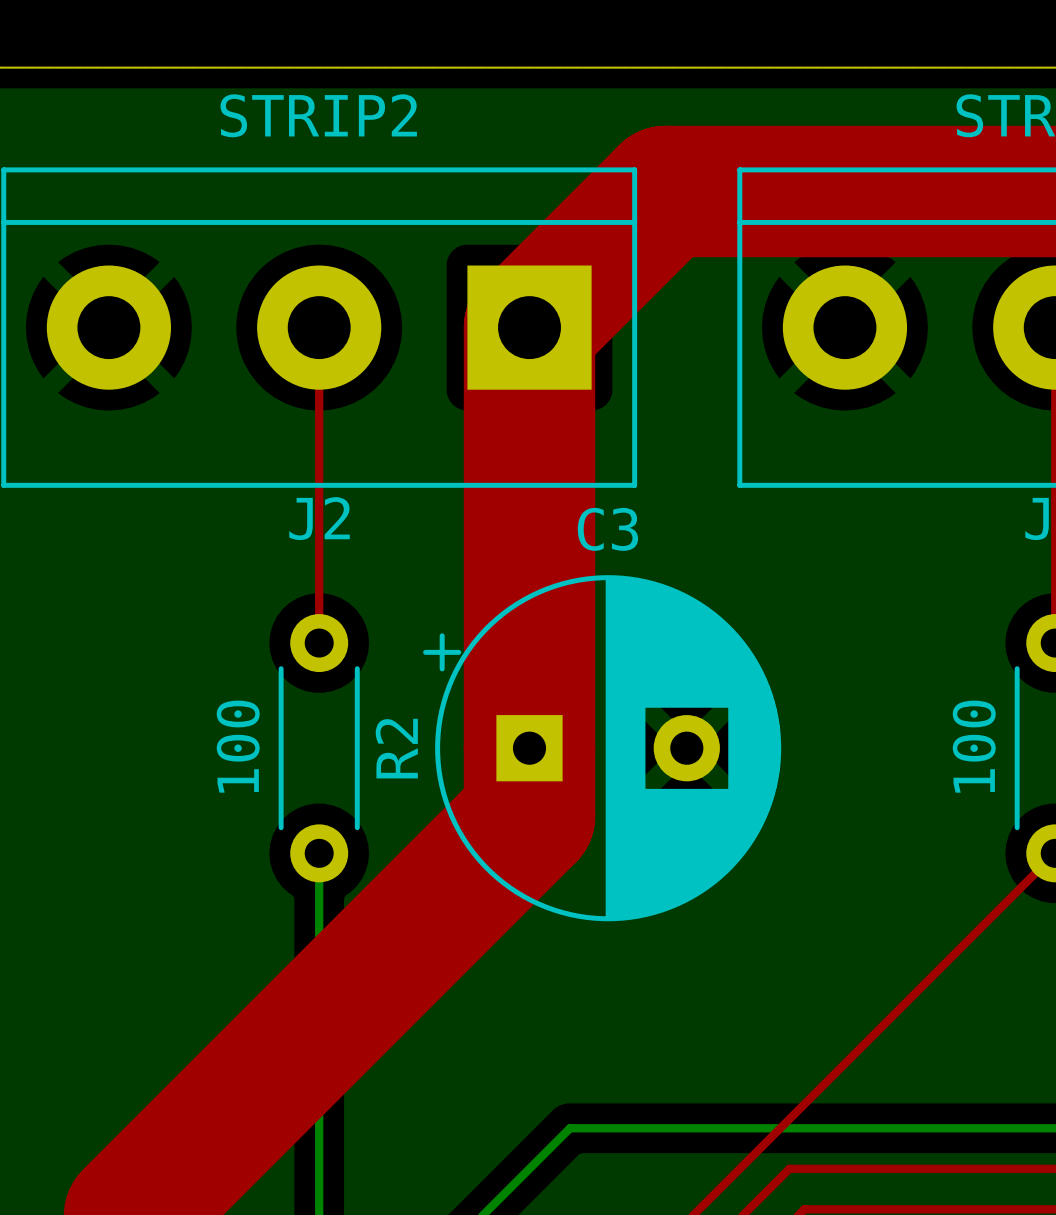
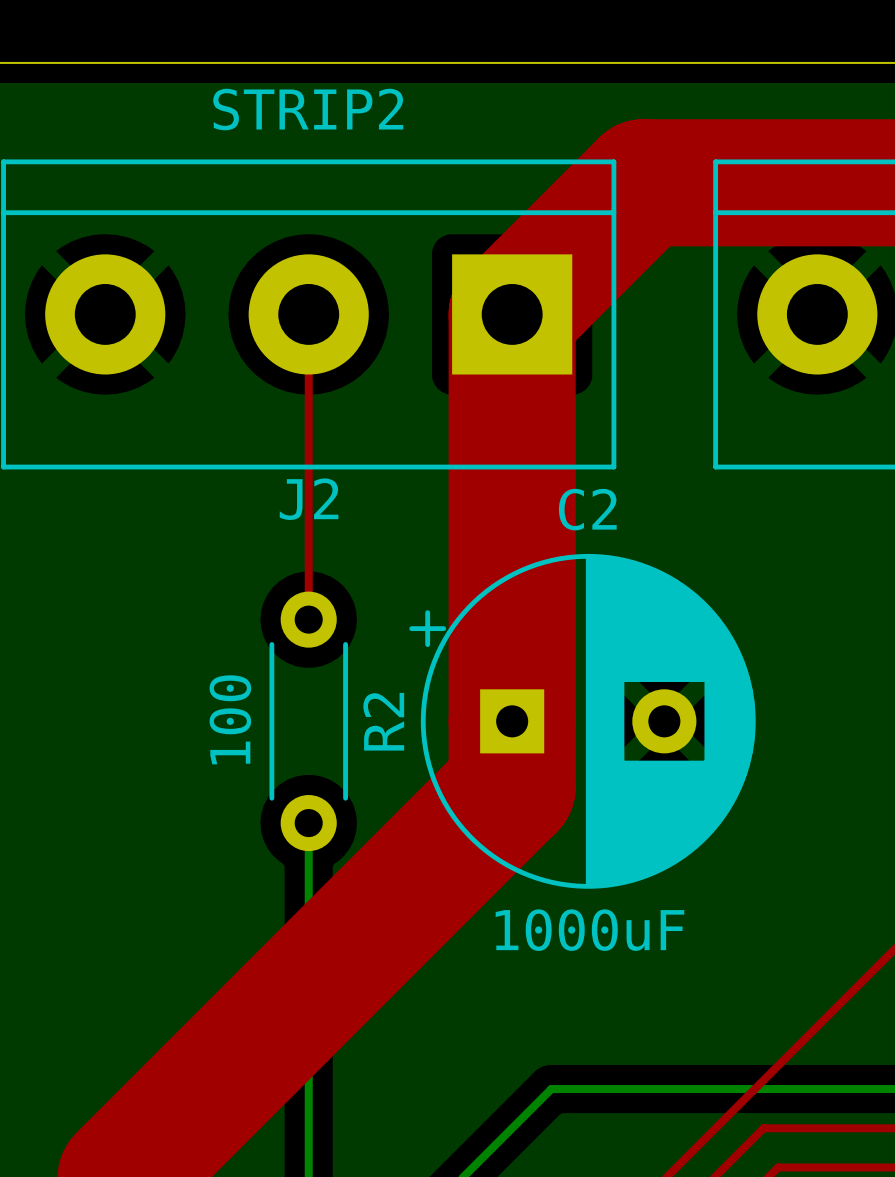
C3 name: C3 (607, 529) -> C2 (587, 509)
C3 value: none -> 1000uF (589, 930)

